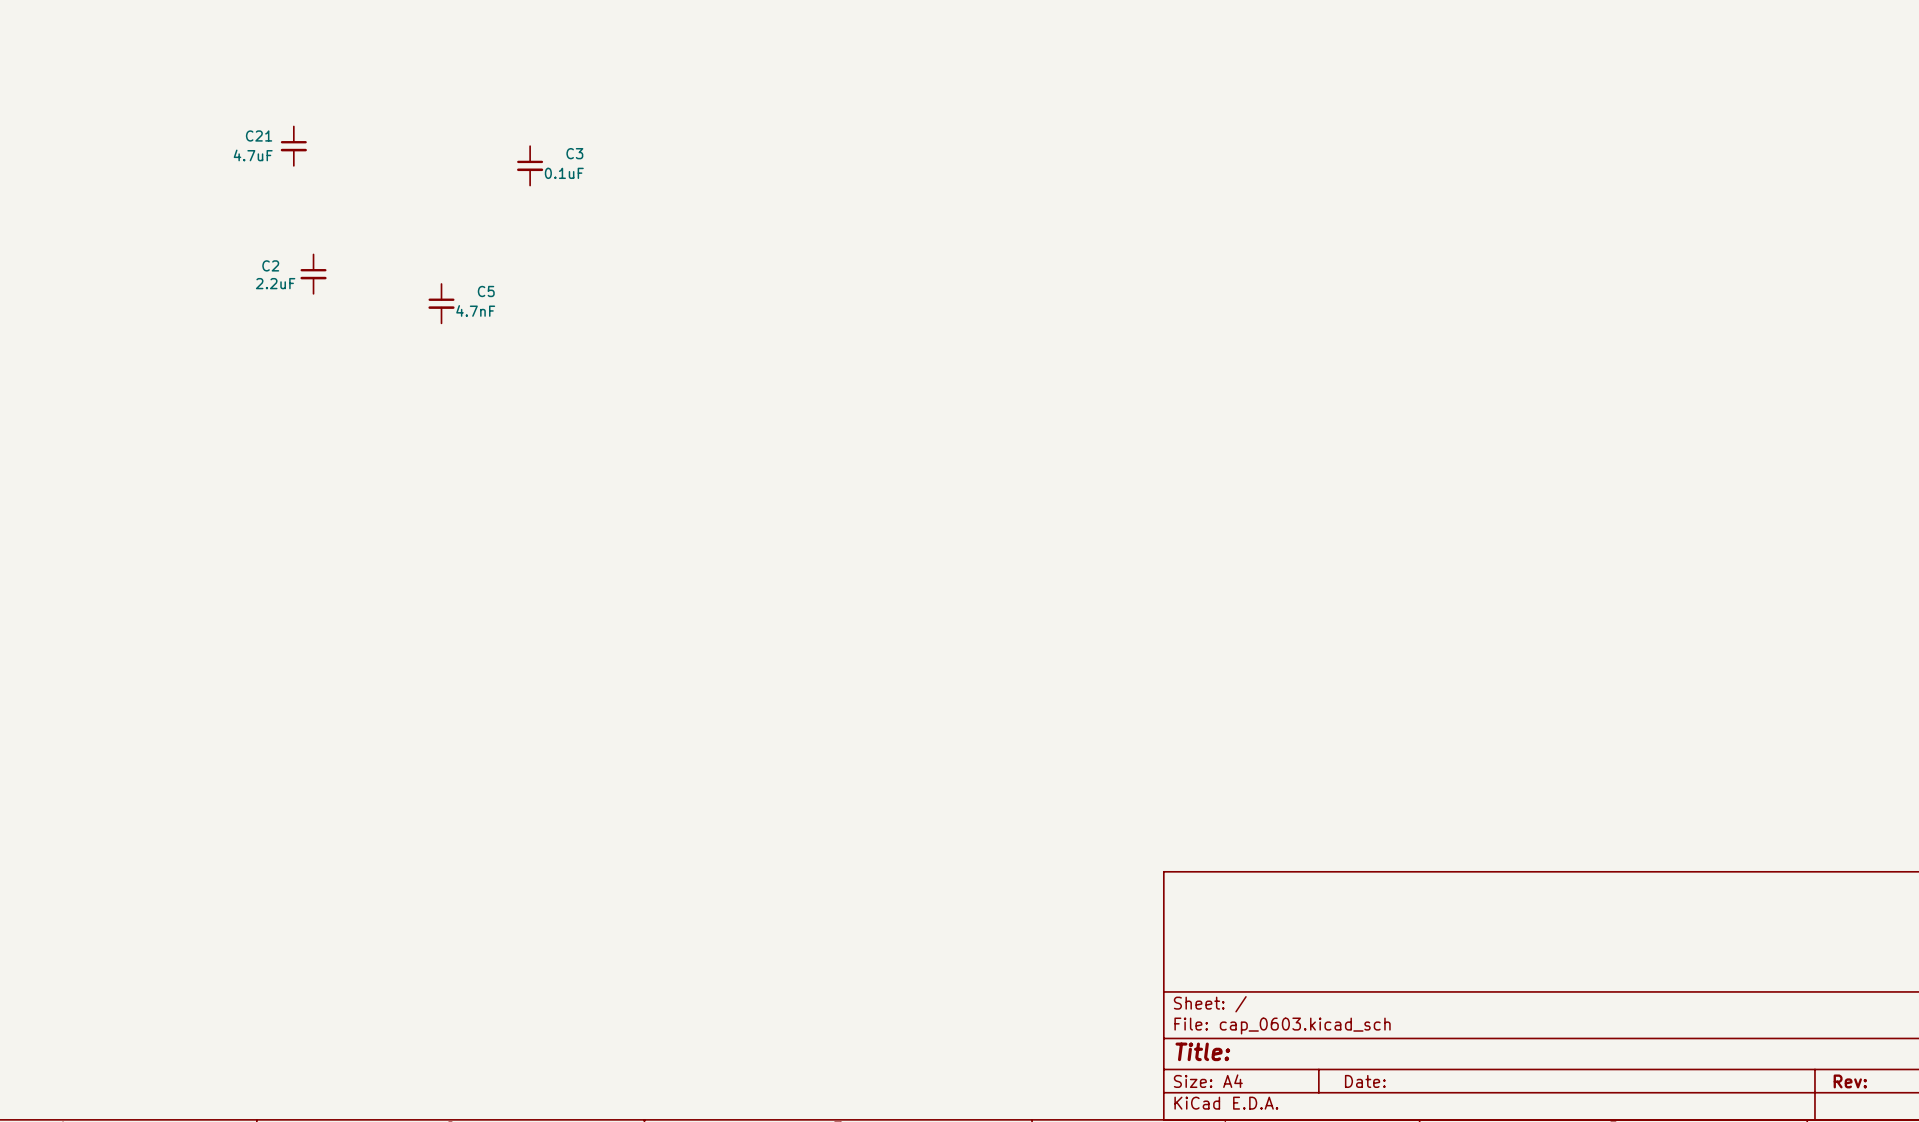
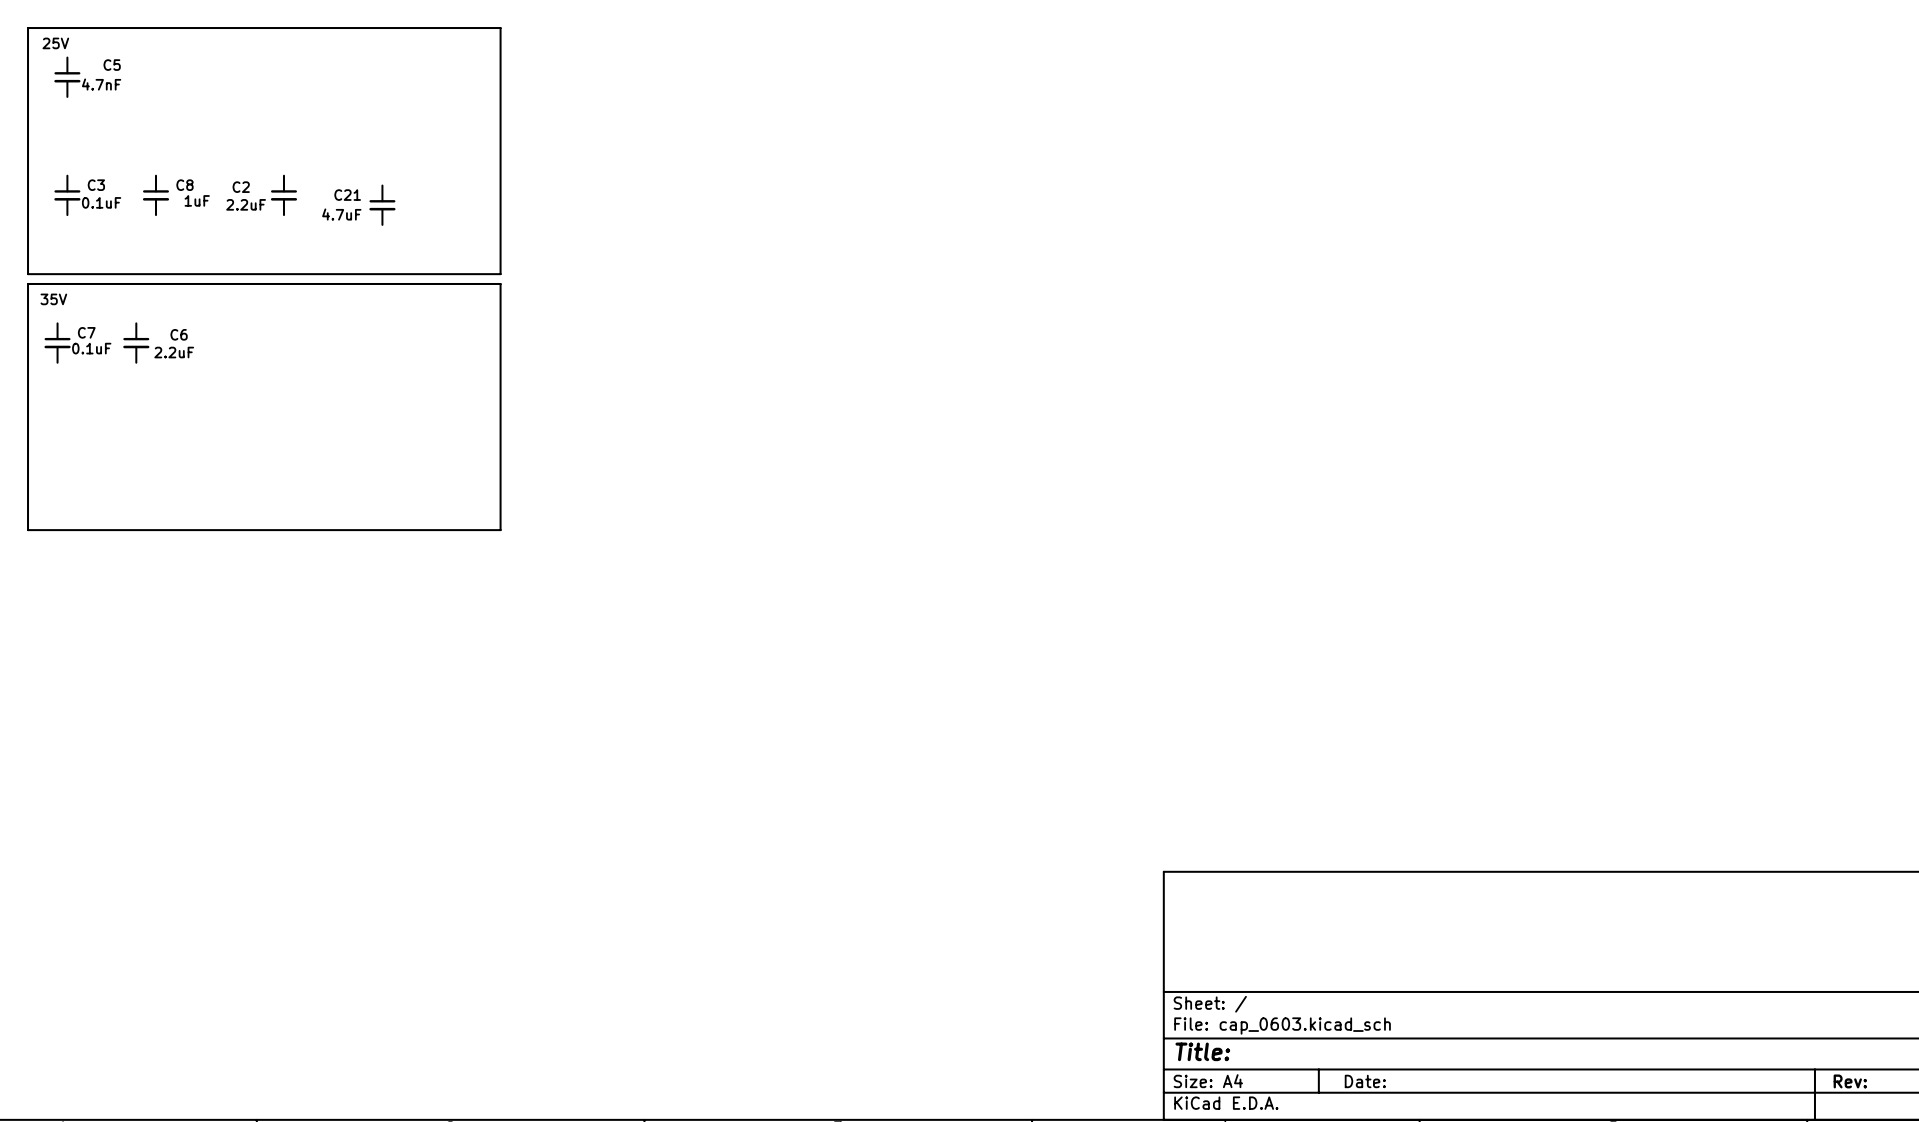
line: none -> (28, 28) (500, 28) (500, 274) (28, 274) (28, 28)
text: none -> 25V (55, 43)
C21 position: (293, 146) -> (382, 205)
C3 name position: C3 (574, 153) -> C3 (96, 185)
C3 position: (530, 165) -> (67, 195)
C8: none -> 1uF (156, 195)
C2 position: (313, 274) -> (283, 195)
line: none -> (28, 283) (28, 530) (500, 530) (500, 283) (28, 283)
text: none -> 35V (53, 299)
C5 position: (441, 303) -> (67, 77)
C7: none -> 0.1uF (57, 343)
C6: none -> 2.2uF (136, 343)

